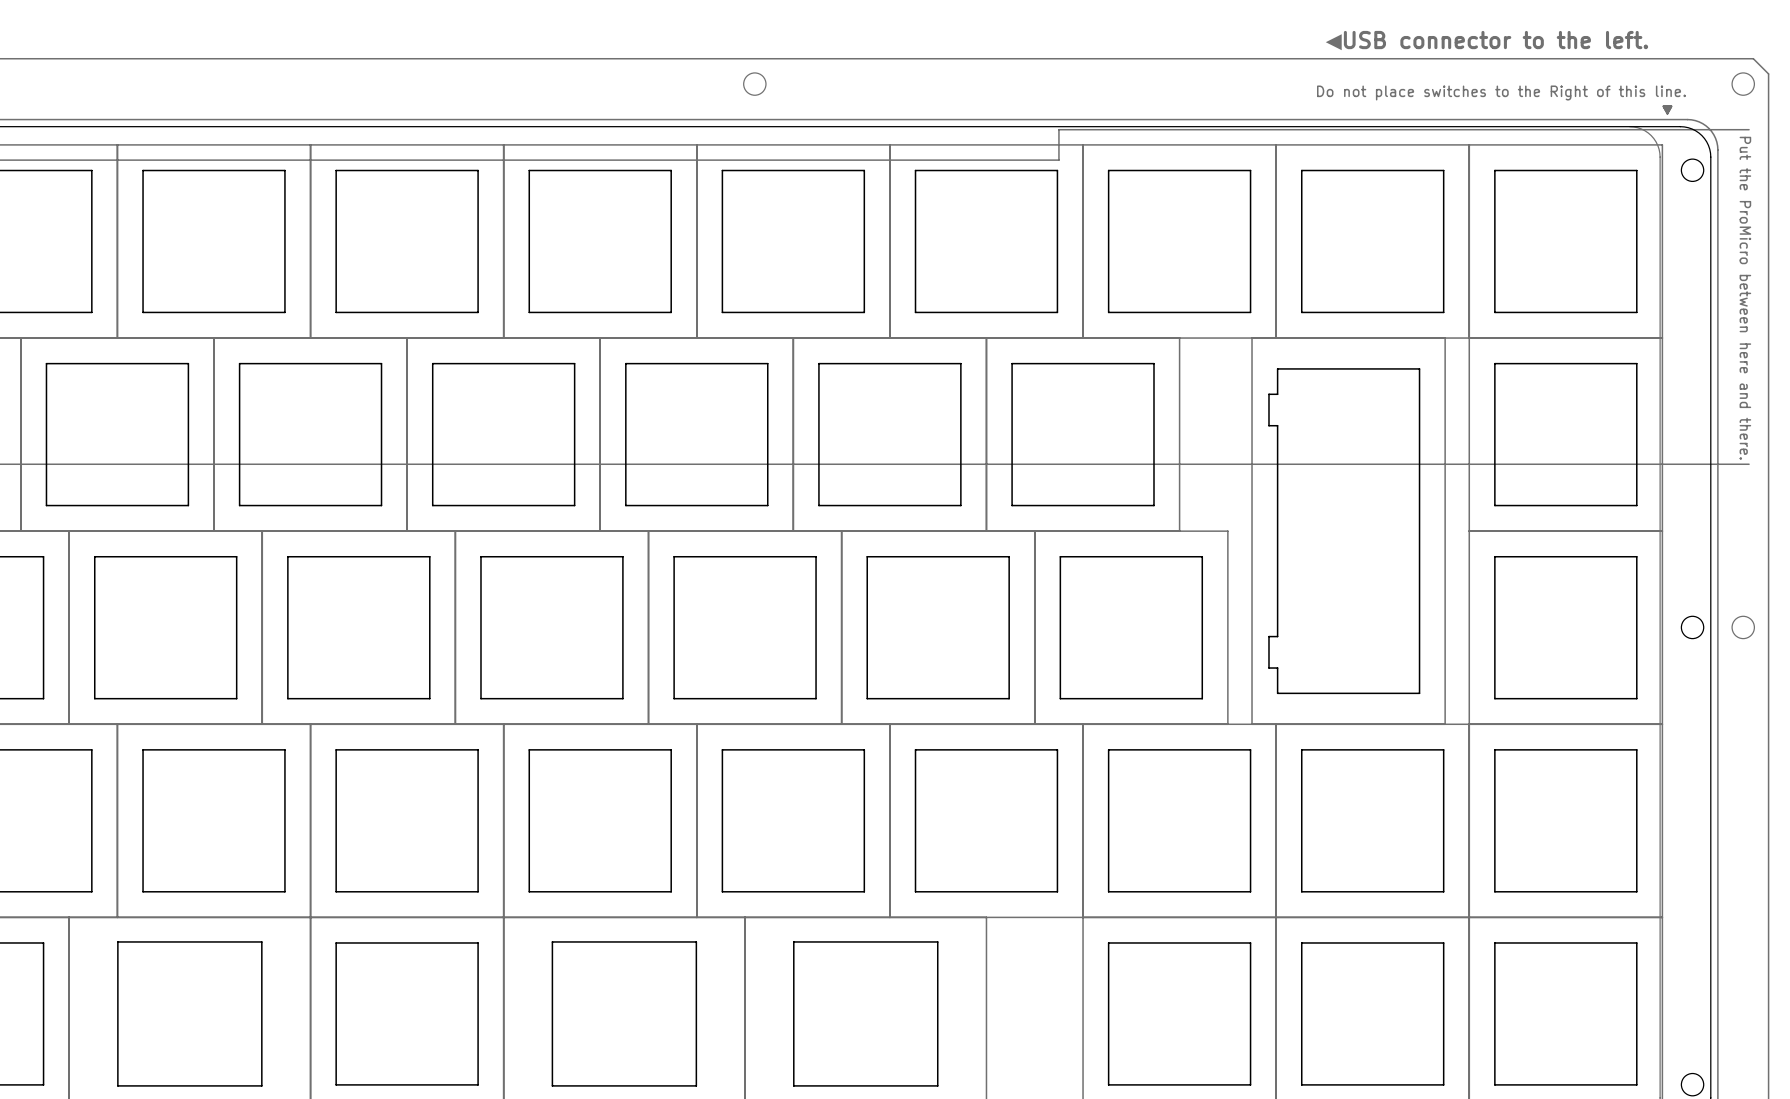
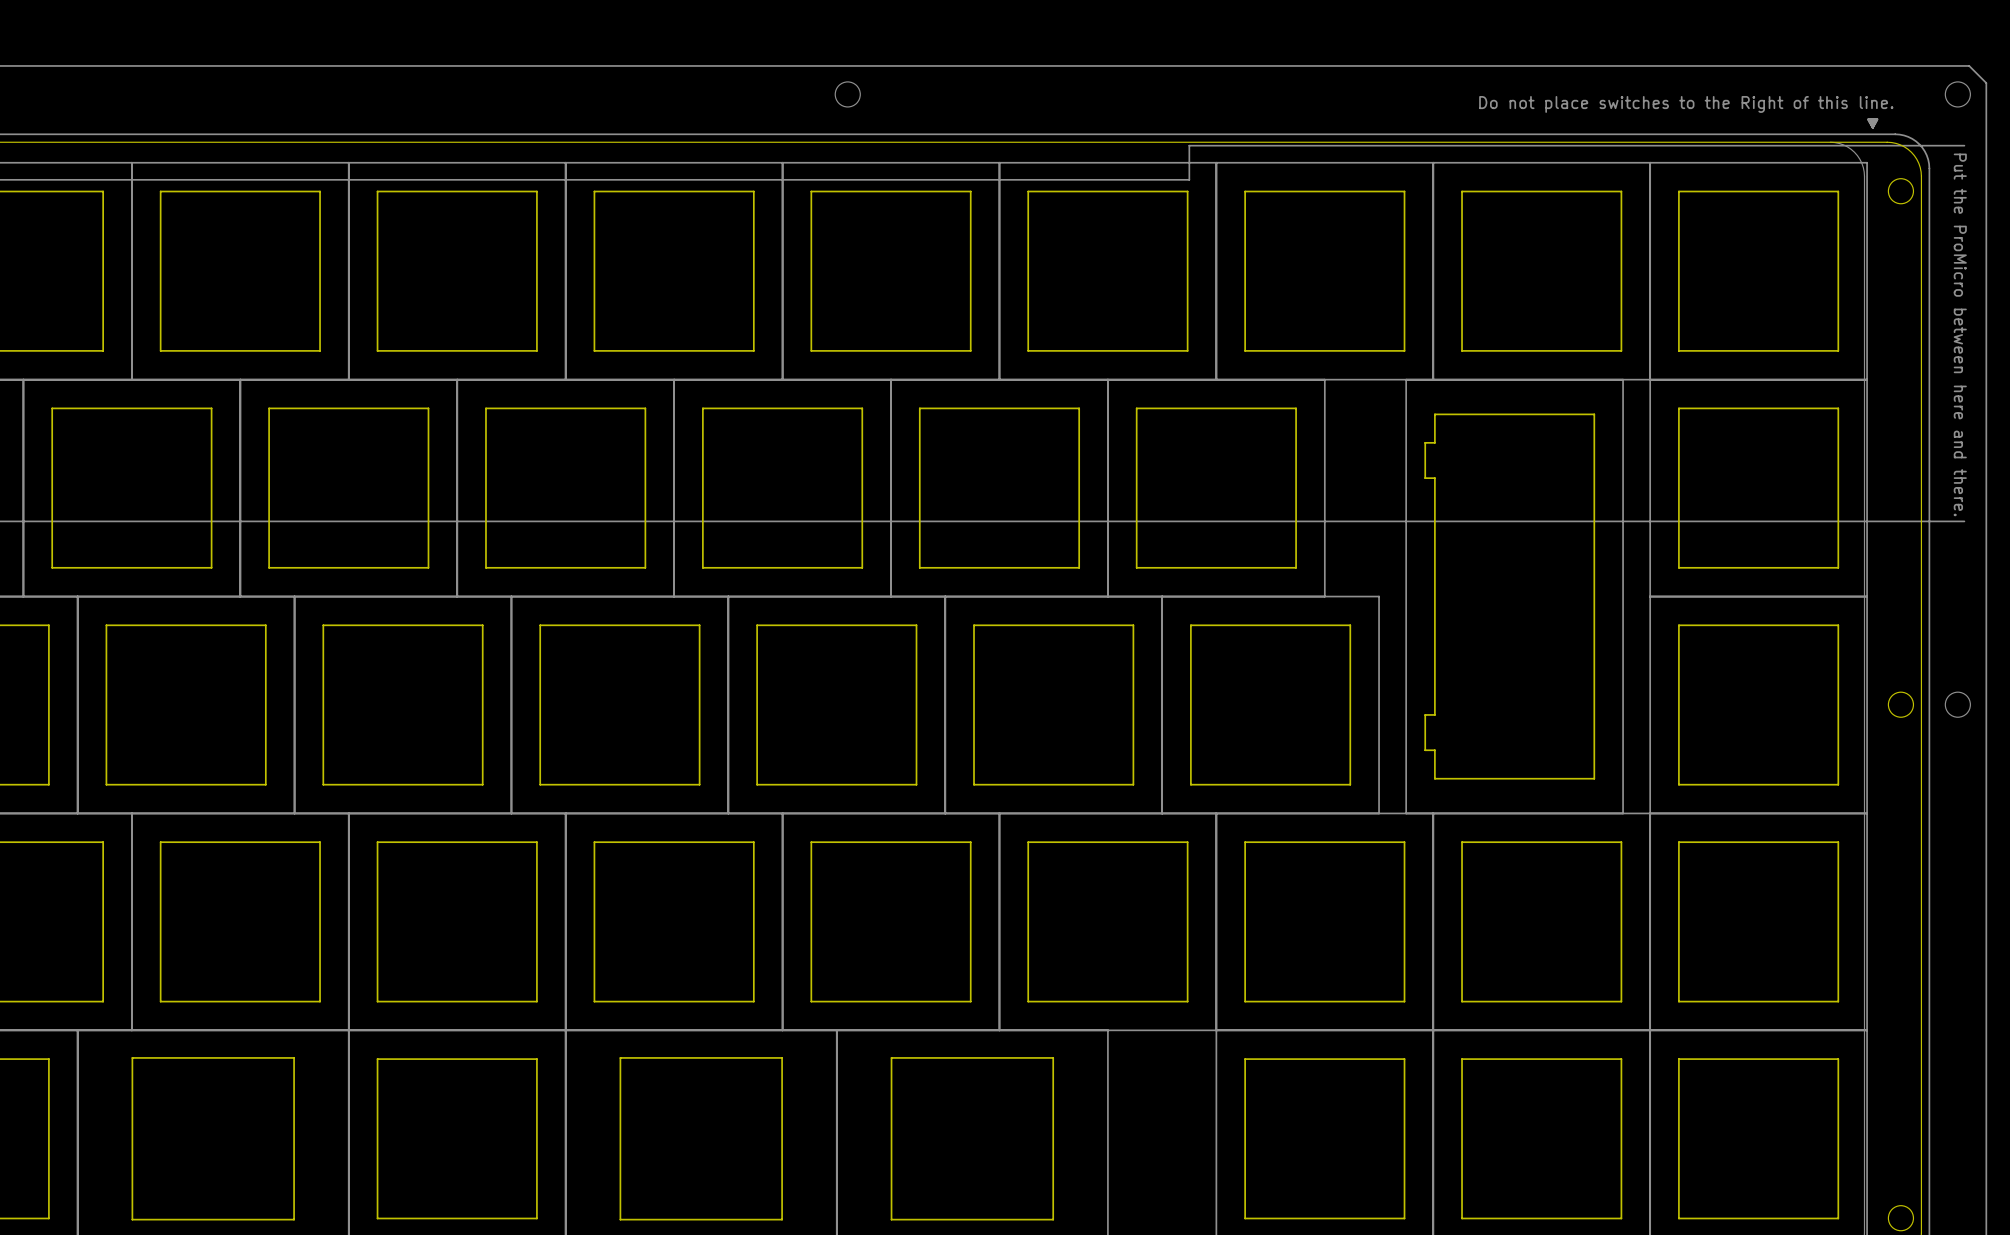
text: ◀USB connector to the left. (1486, 41) -> none

